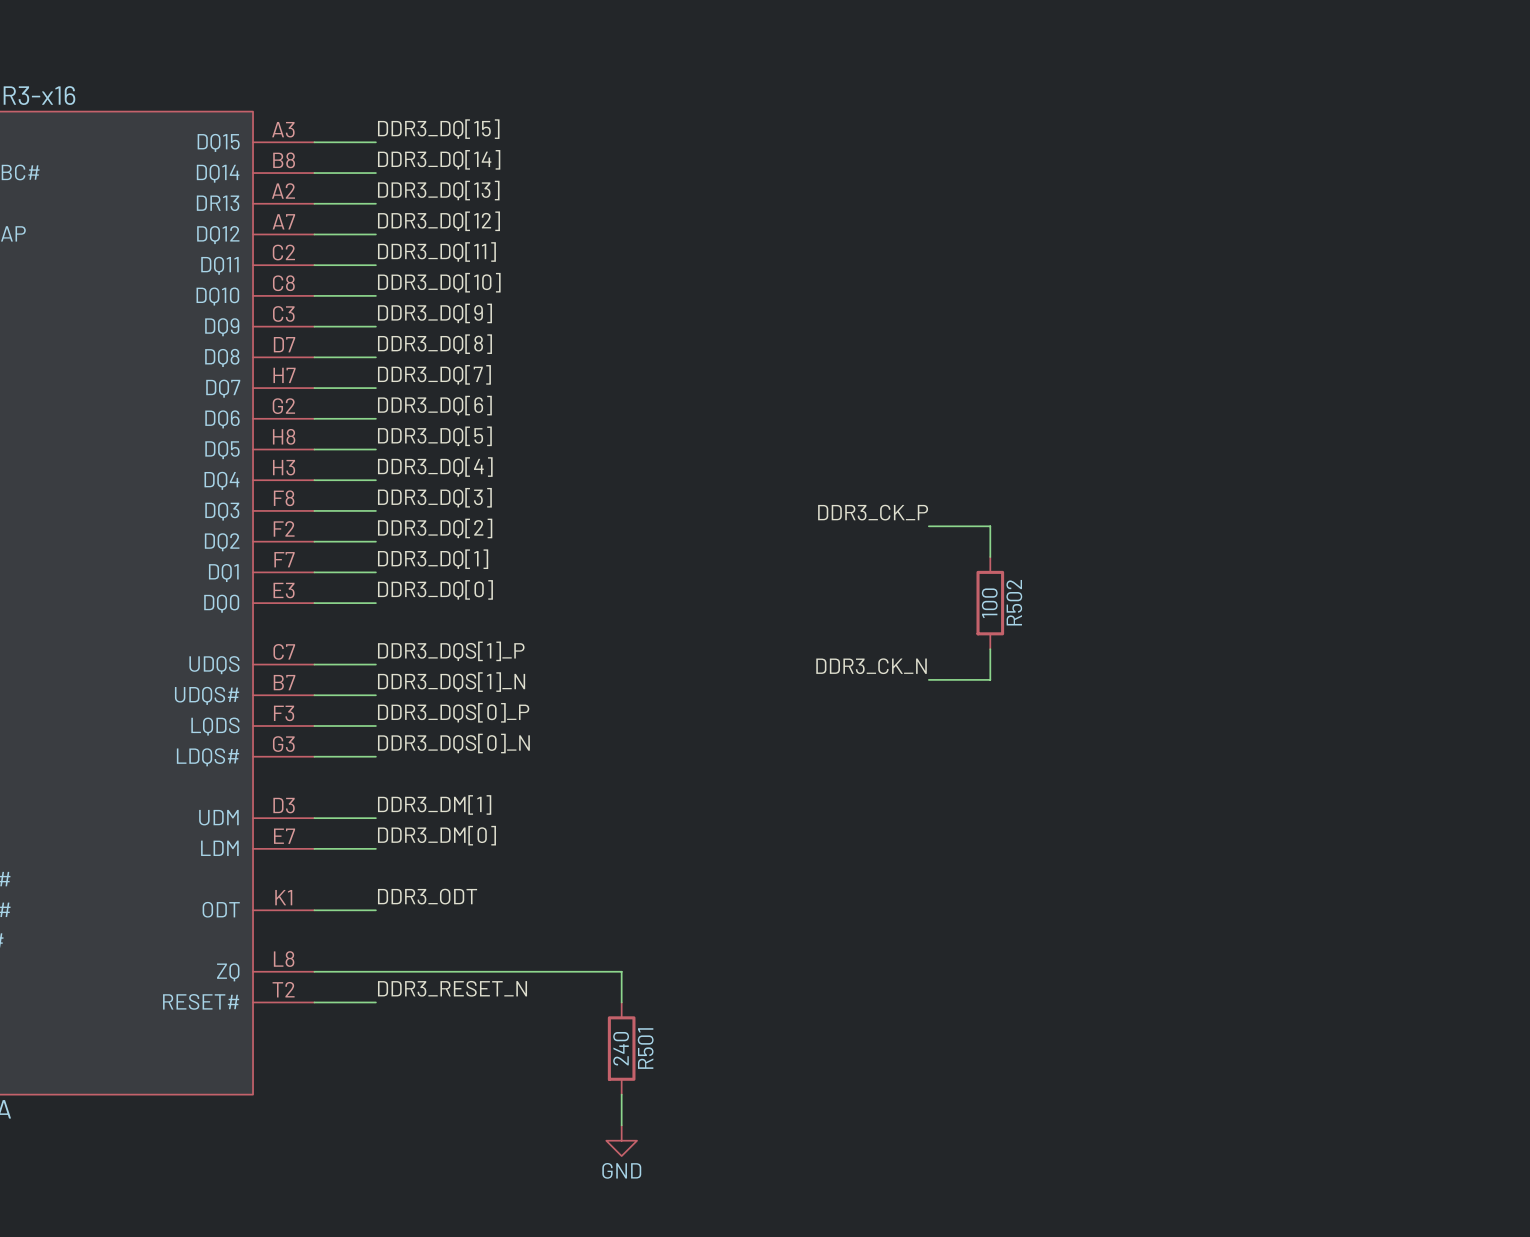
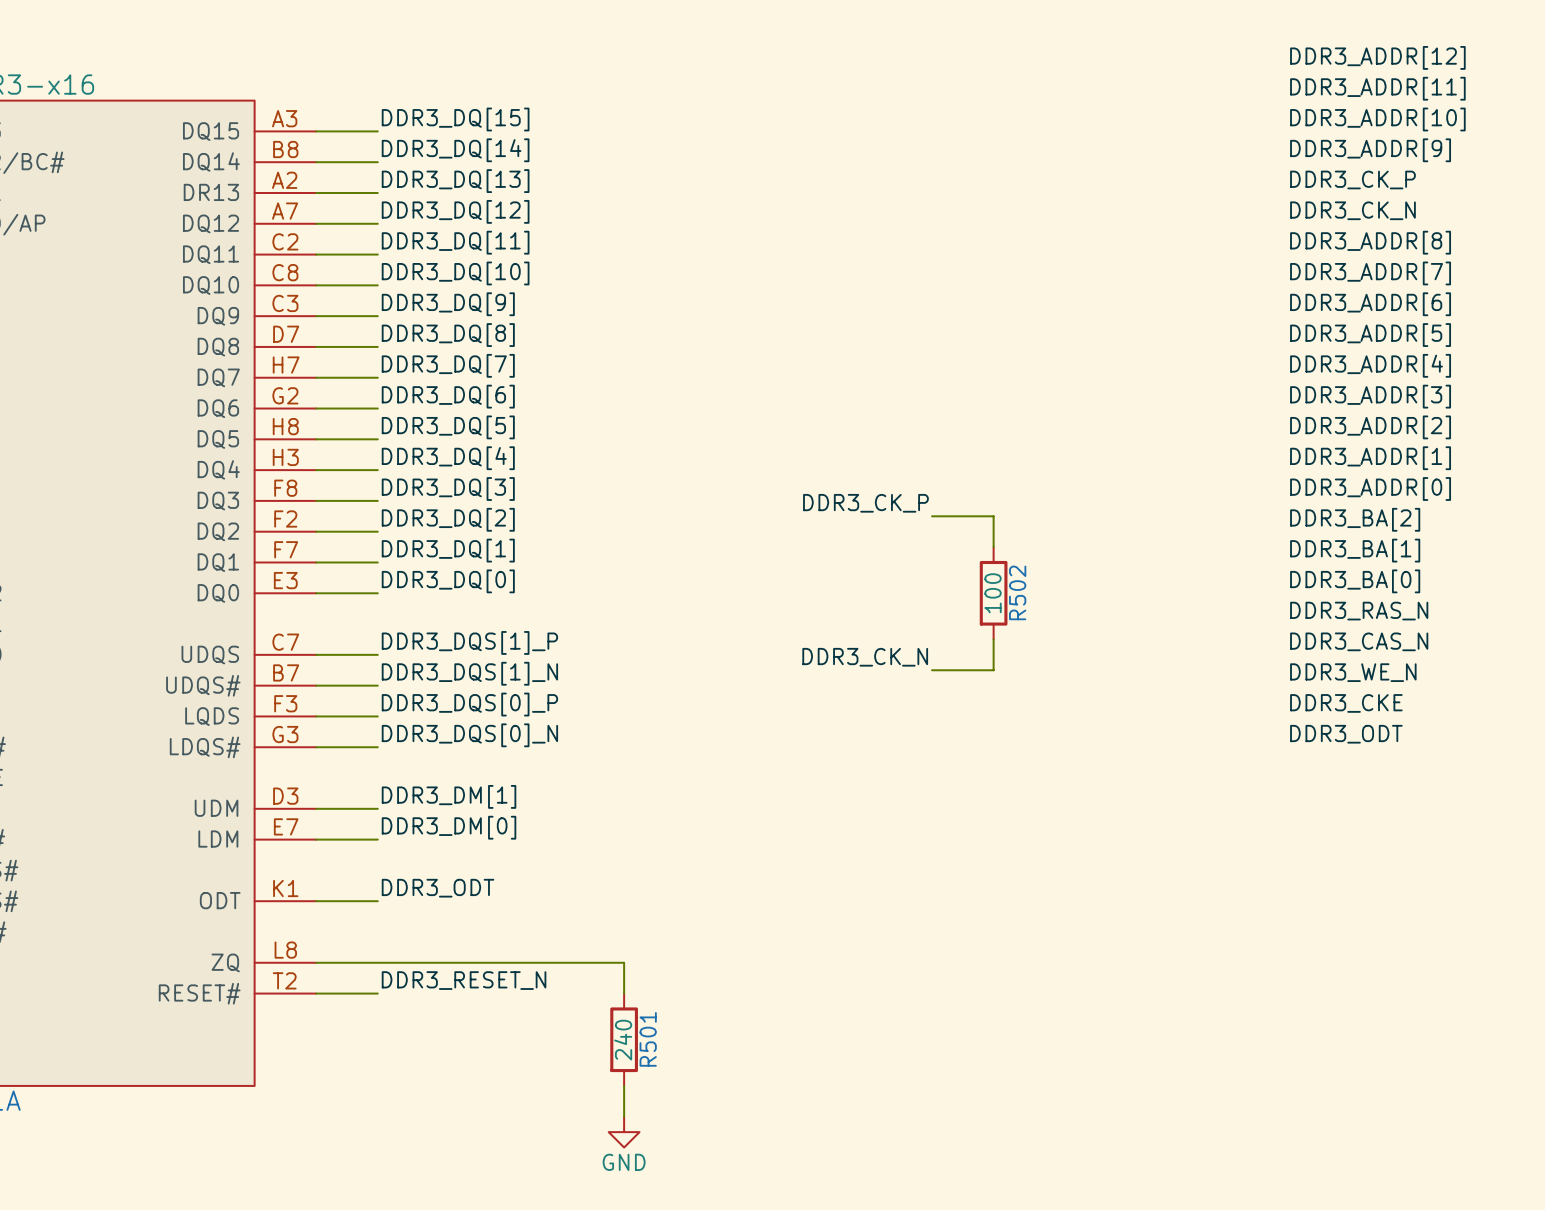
label: none -> DDR3_ADDR[12] (1377, 57)
label: none -> DDR3_ADDR[11] (1377, 88)
label: none -> DDR3_ADDR[10] (1377, 119)
label: none -> DDR3_ADDR[9] (1370, 150)
label: none -> DDR3_CK_P (1352, 179)
label: none -> DDR3_CK_N (1352, 210)
label: none -> DDR3_ADDR[8] (1370, 242)
label: none -> DDR3_ADDR[7] (1370, 273)
label: none -> DDR3_ADDR[6] (1370, 304)
label: none -> DDR3_ADDR[5] (1370, 335)
label: none -> DDR3_ADDR[4] (1370, 365)
label: none -> DDR3_ADDR[3] (1370, 396)
label: none -> DDR3_ADDR[2] (1370, 427)
label: none -> DDR3_ADDR[1] (1370, 458)
label: none -> DDR3_ADDR[0] (1370, 489)
label: none -> DDR3_BA[2] (1355, 519)
label: none -> DDR3_BA[1] (1355, 550)
label: none -> DDR3_BA[0] (1355, 581)
label: none -> DDR3_RAS_N (1359, 611)
label: none -> DDR3_CAS_N (1359, 641)
label: none -> DDR3_WE_N (1353, 672)
label: none -> DDR3_CKE (1346, 703)
label: none -> DDR3_ODT (1346, 734)

